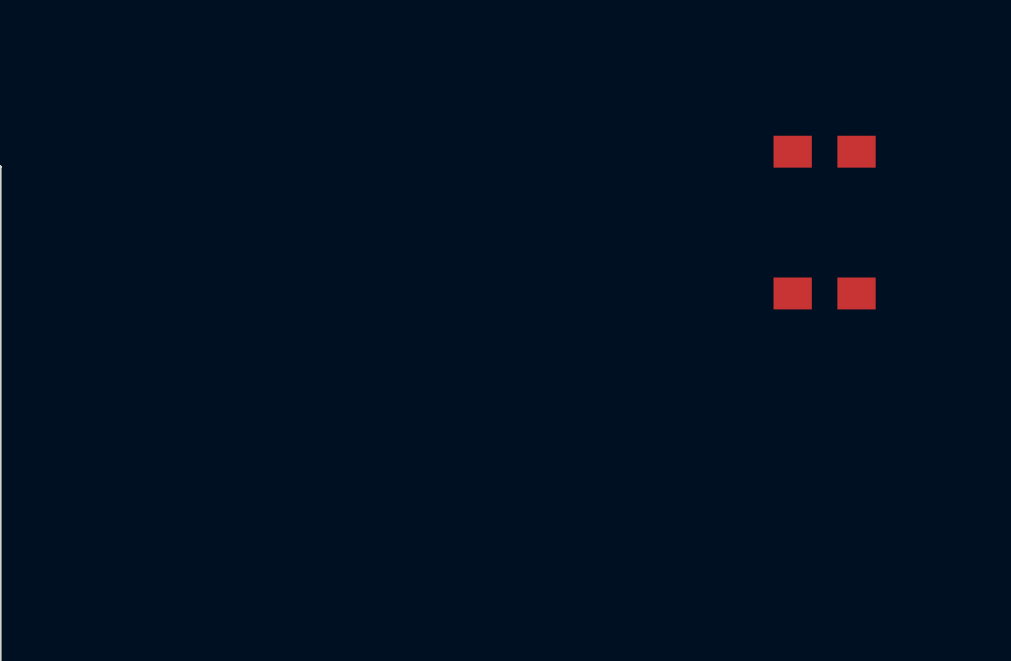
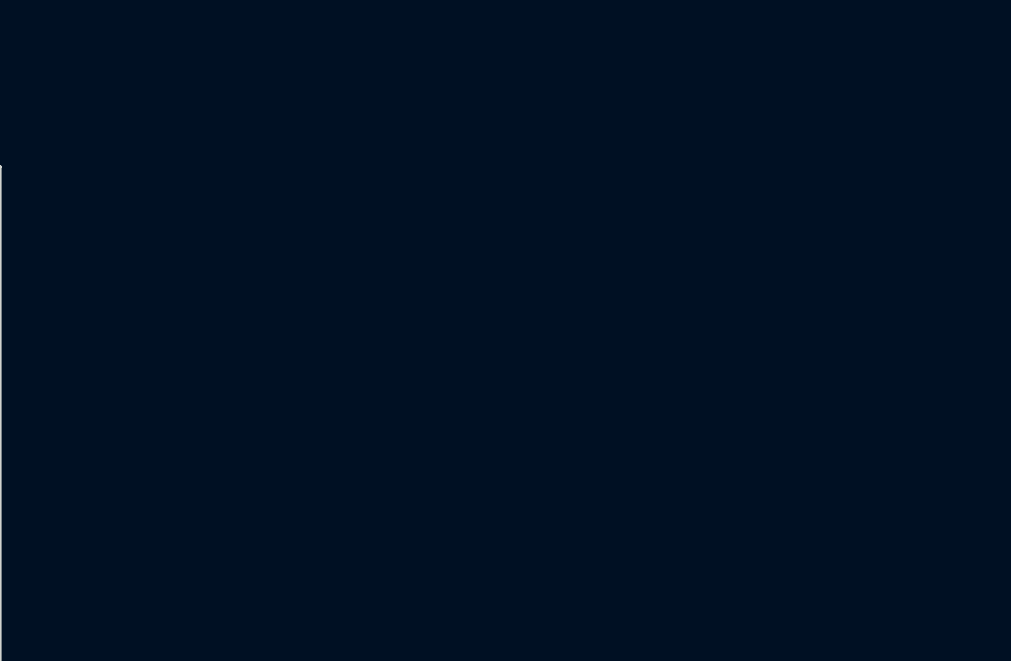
part: (824, 151) -> none
part: (824, 293) -> none

